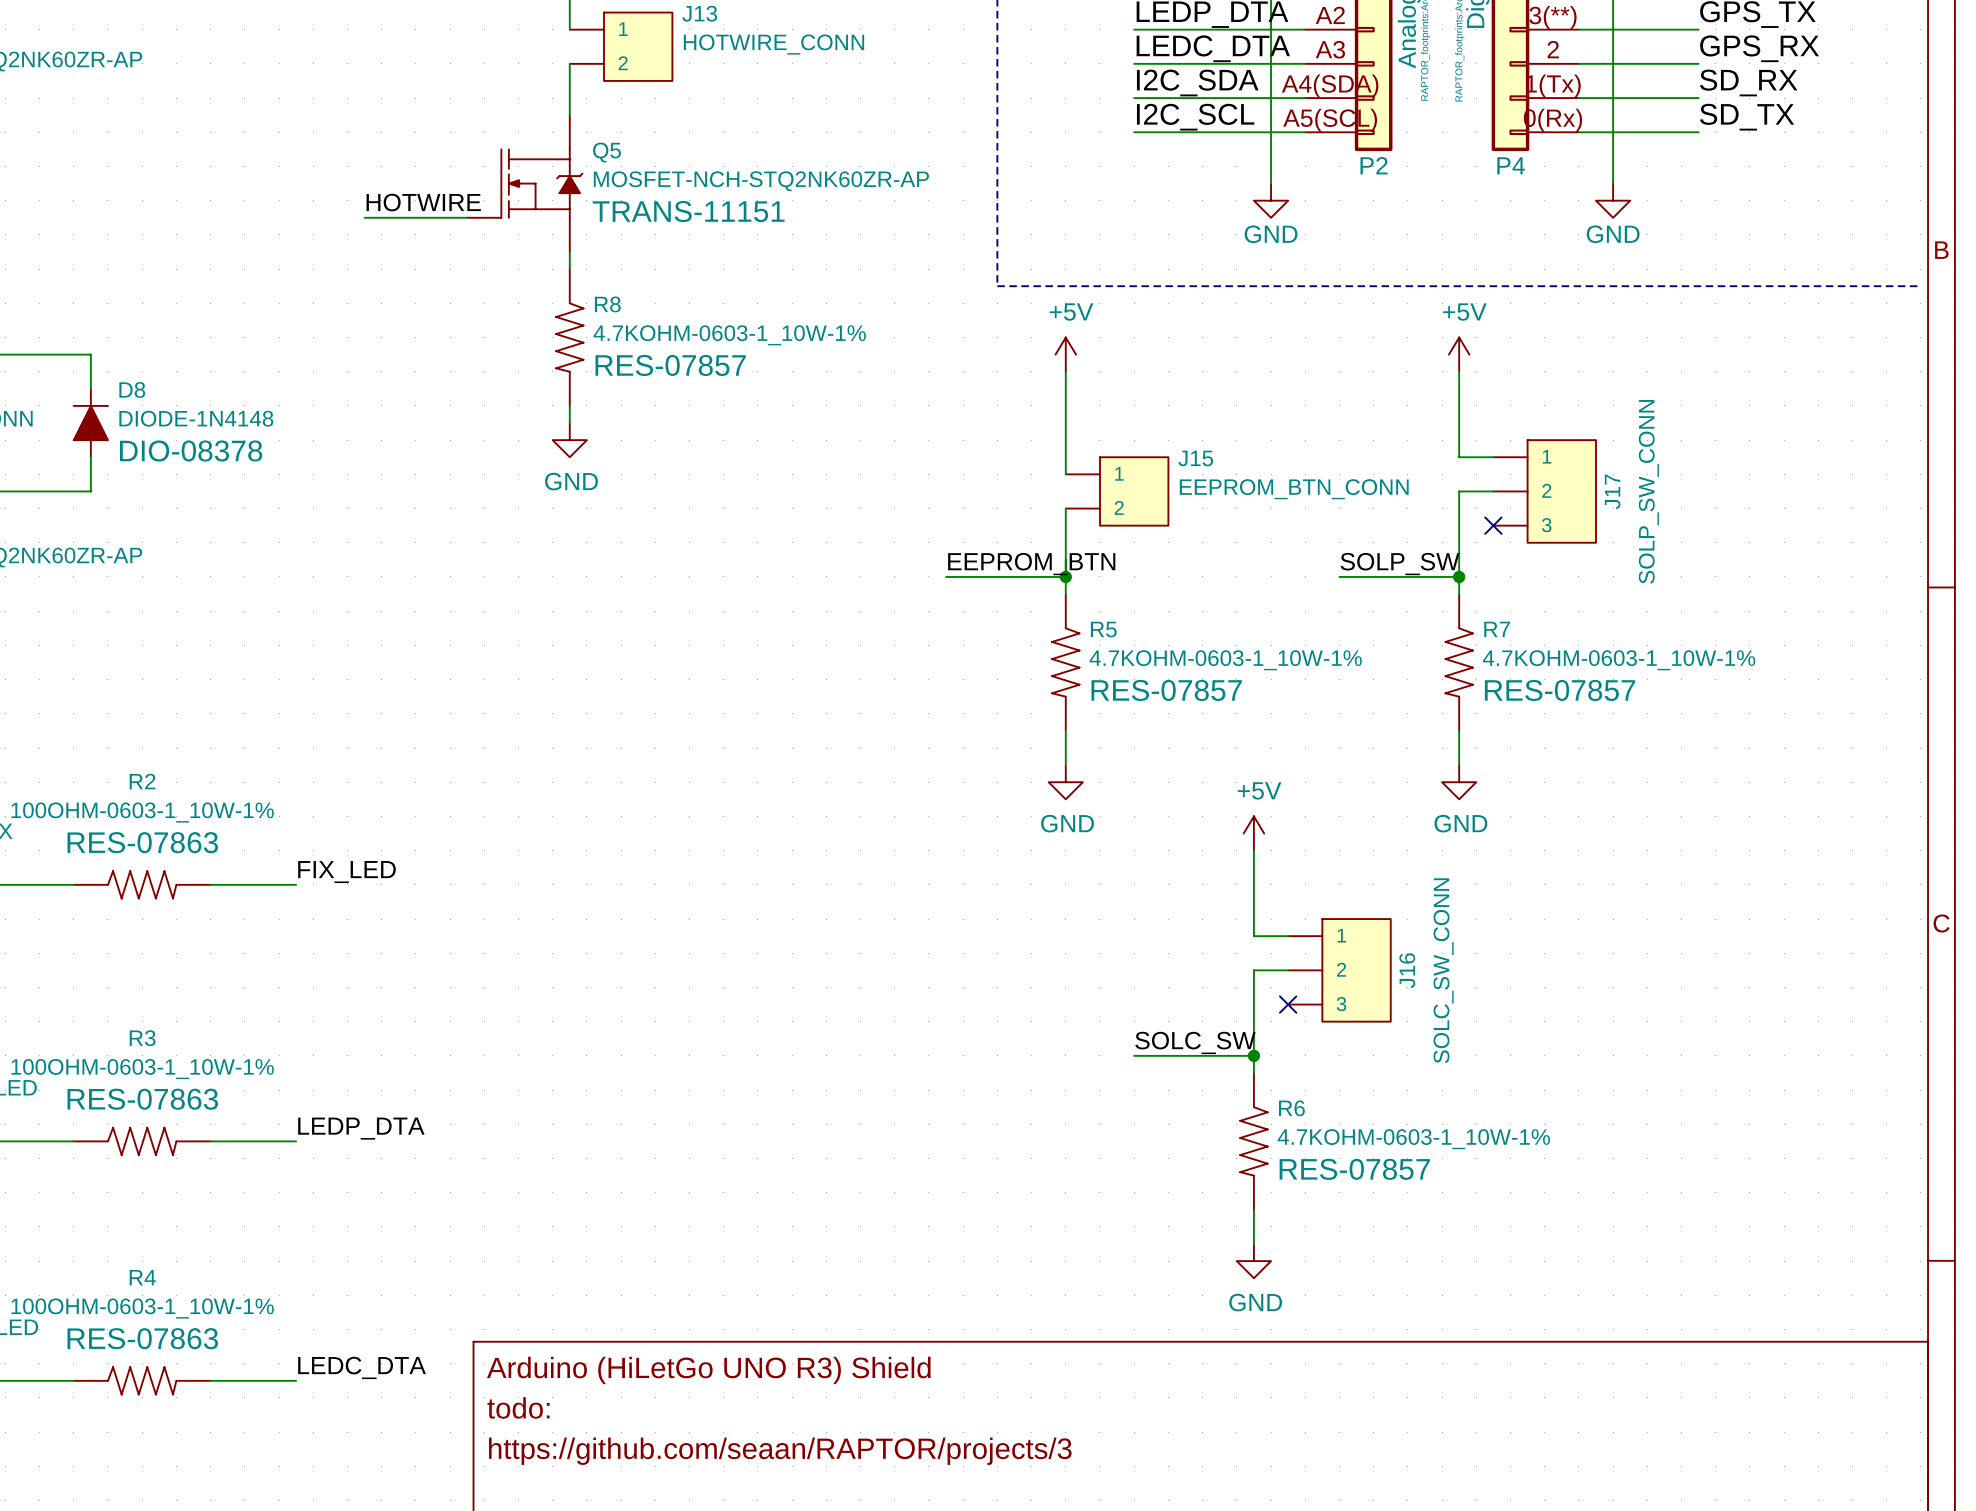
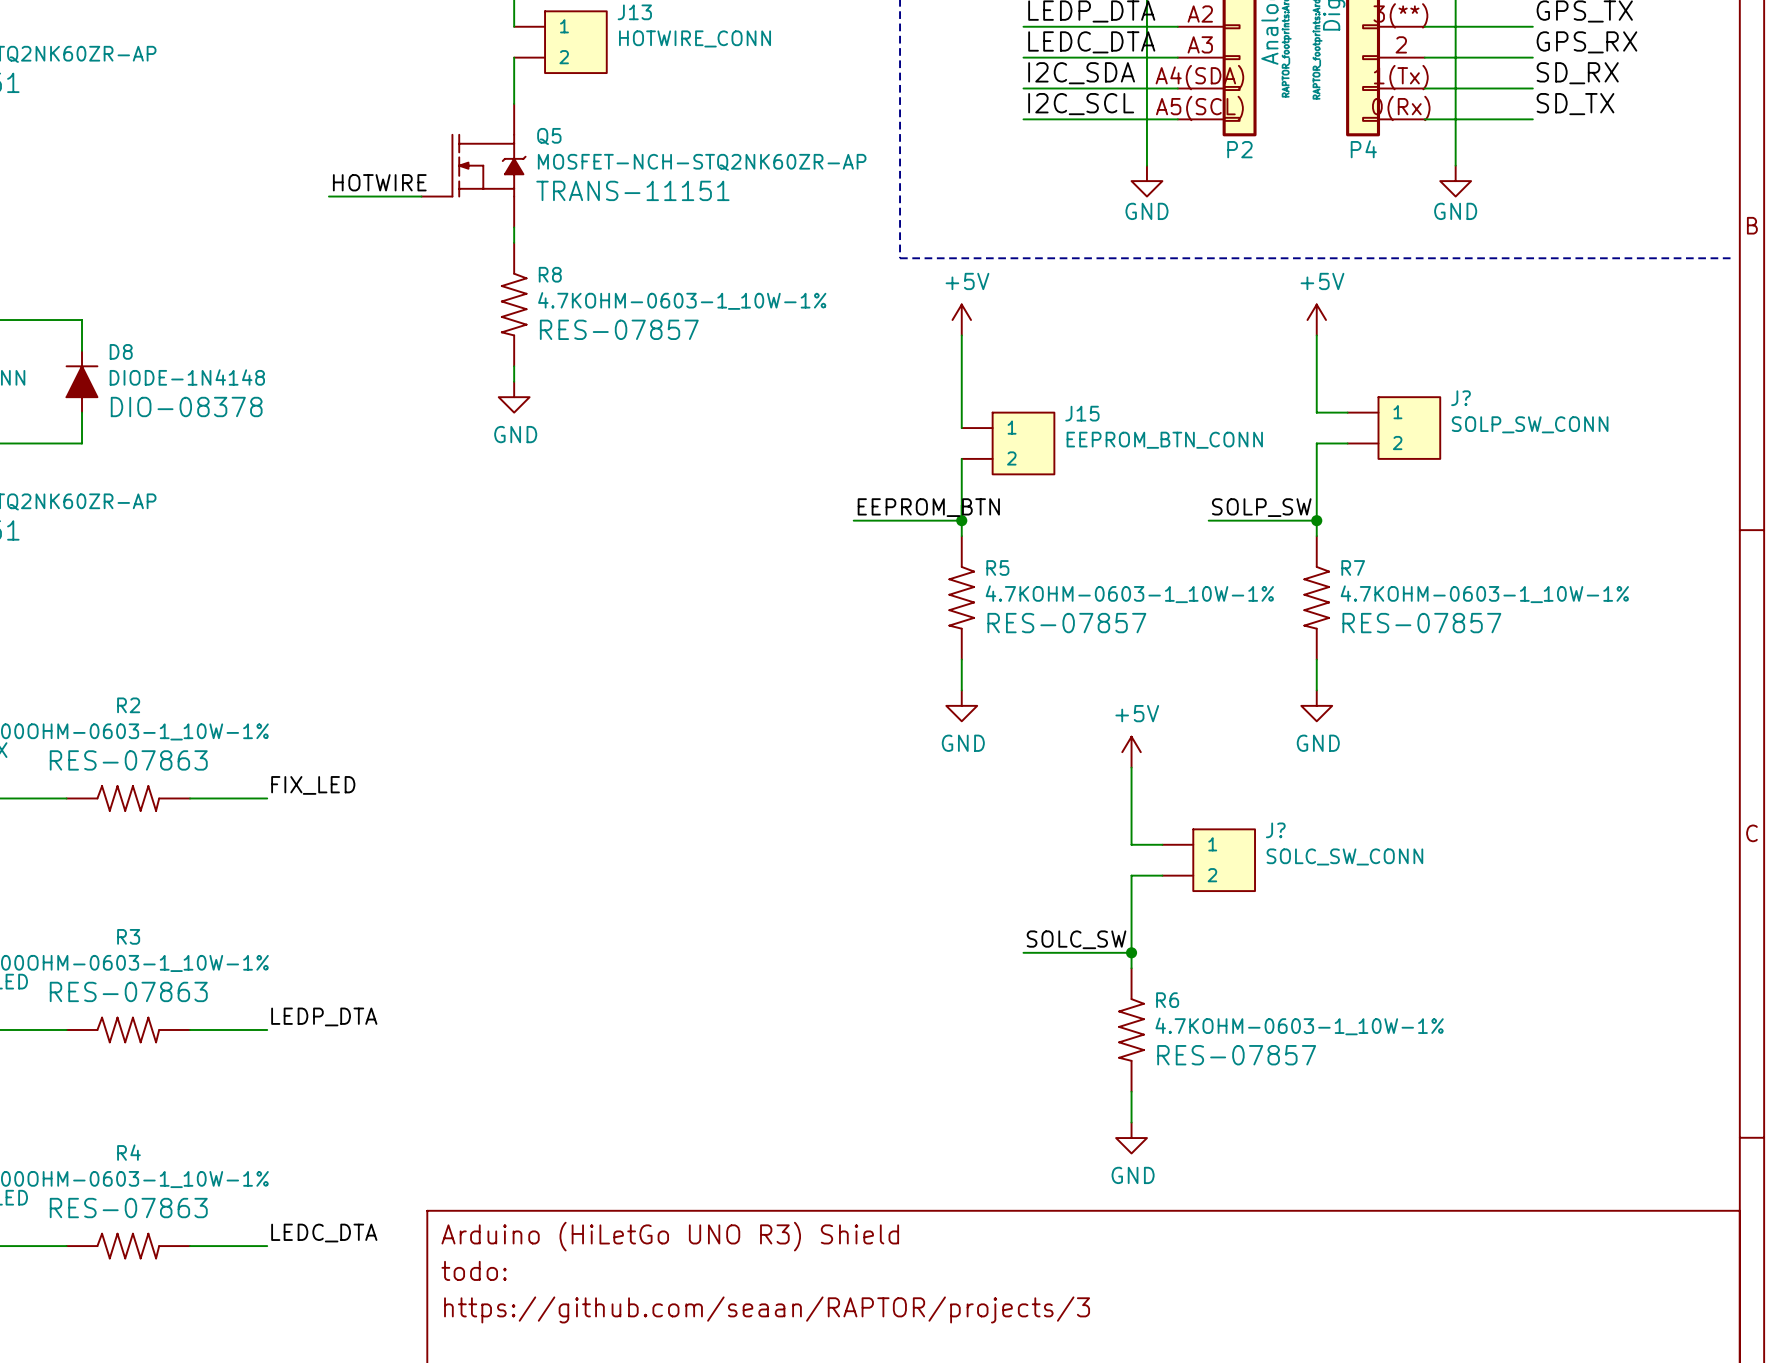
J?: none -> SOLP_SW_CONN (1393, 428)
J17: SOLP_SW_CONN (1544, 491) -> none
no-connect mark: (1493, 525) -> none
J?: none -> SOLC_SW_CONN (1208, 860)
J16: SOLC_SW_CONN (1339, 970) -> none
no-connect mark: (1288, 1004) -> none

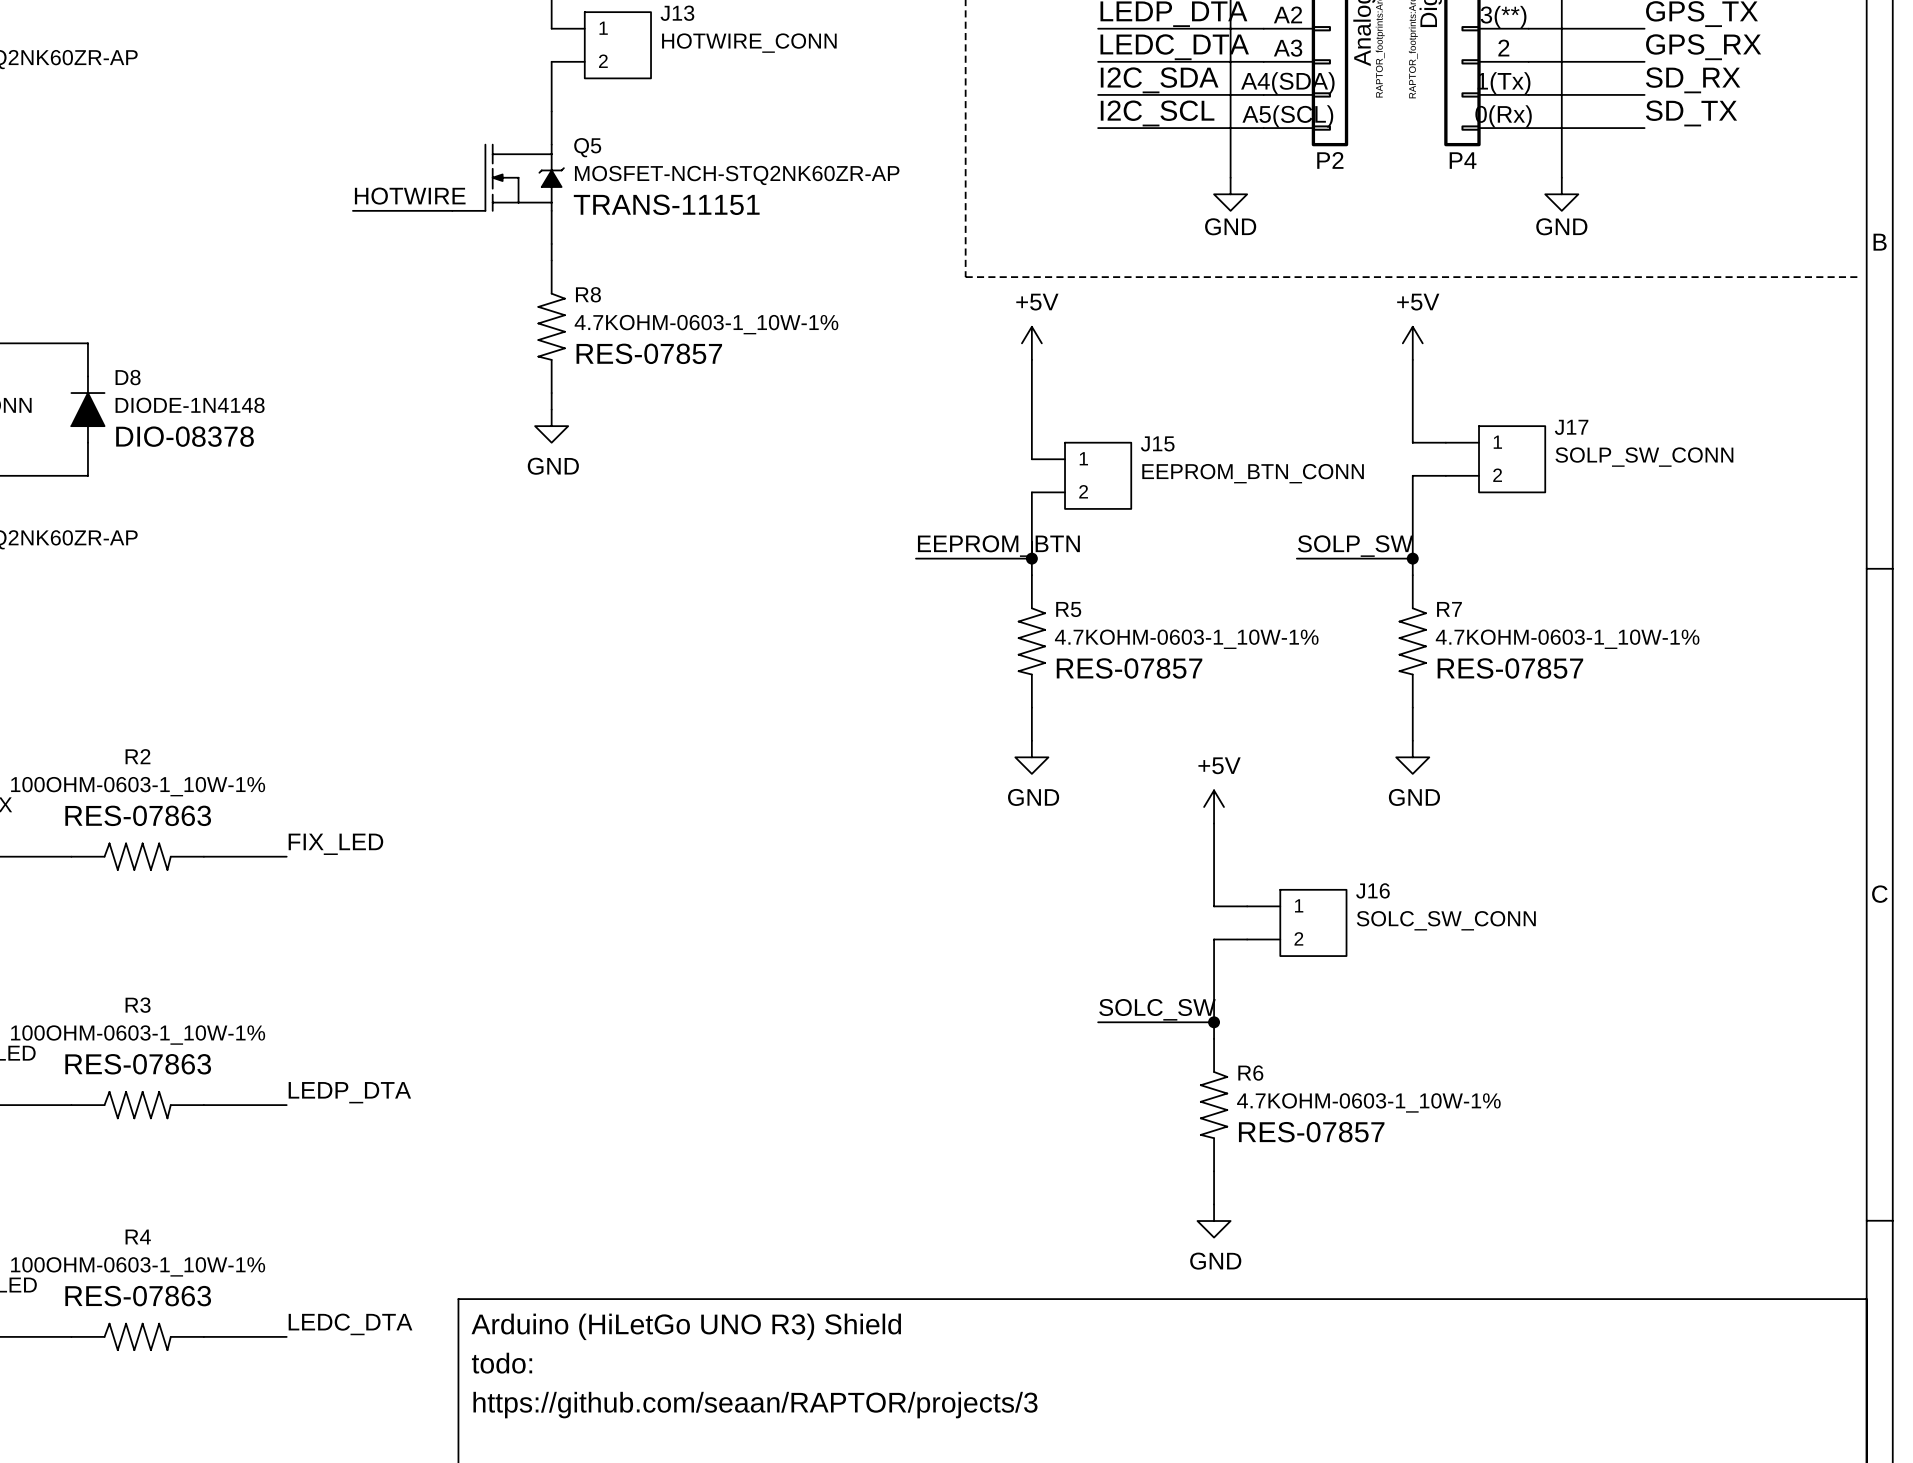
J? name: J? (1461, 398) -> J17 (1571, 427)
J? name: J? (1275, 830) -> J16 (1372, 890)

